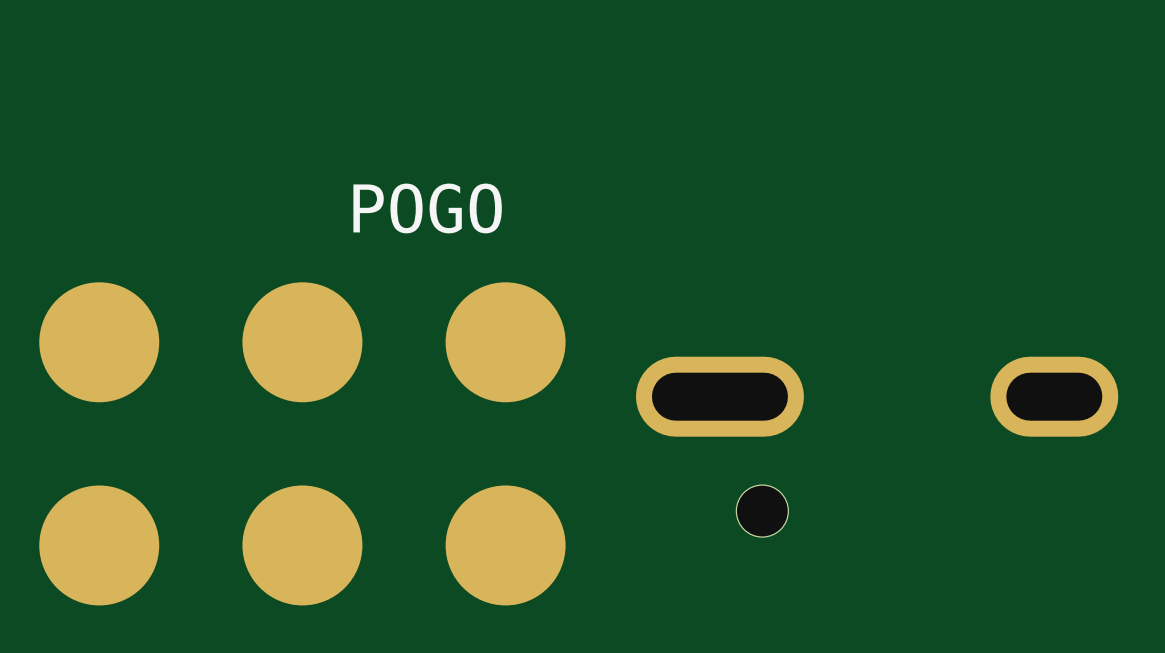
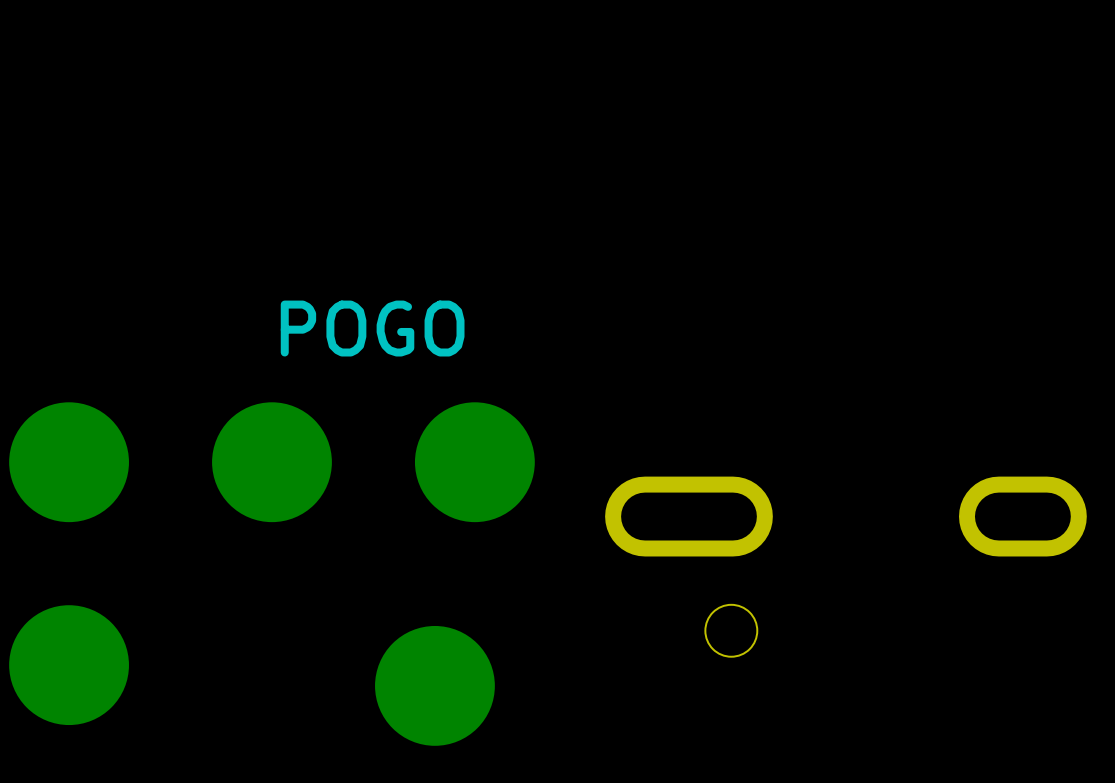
part: (302, 545) -> none
part position: (505, 545) -> (434, 685)

